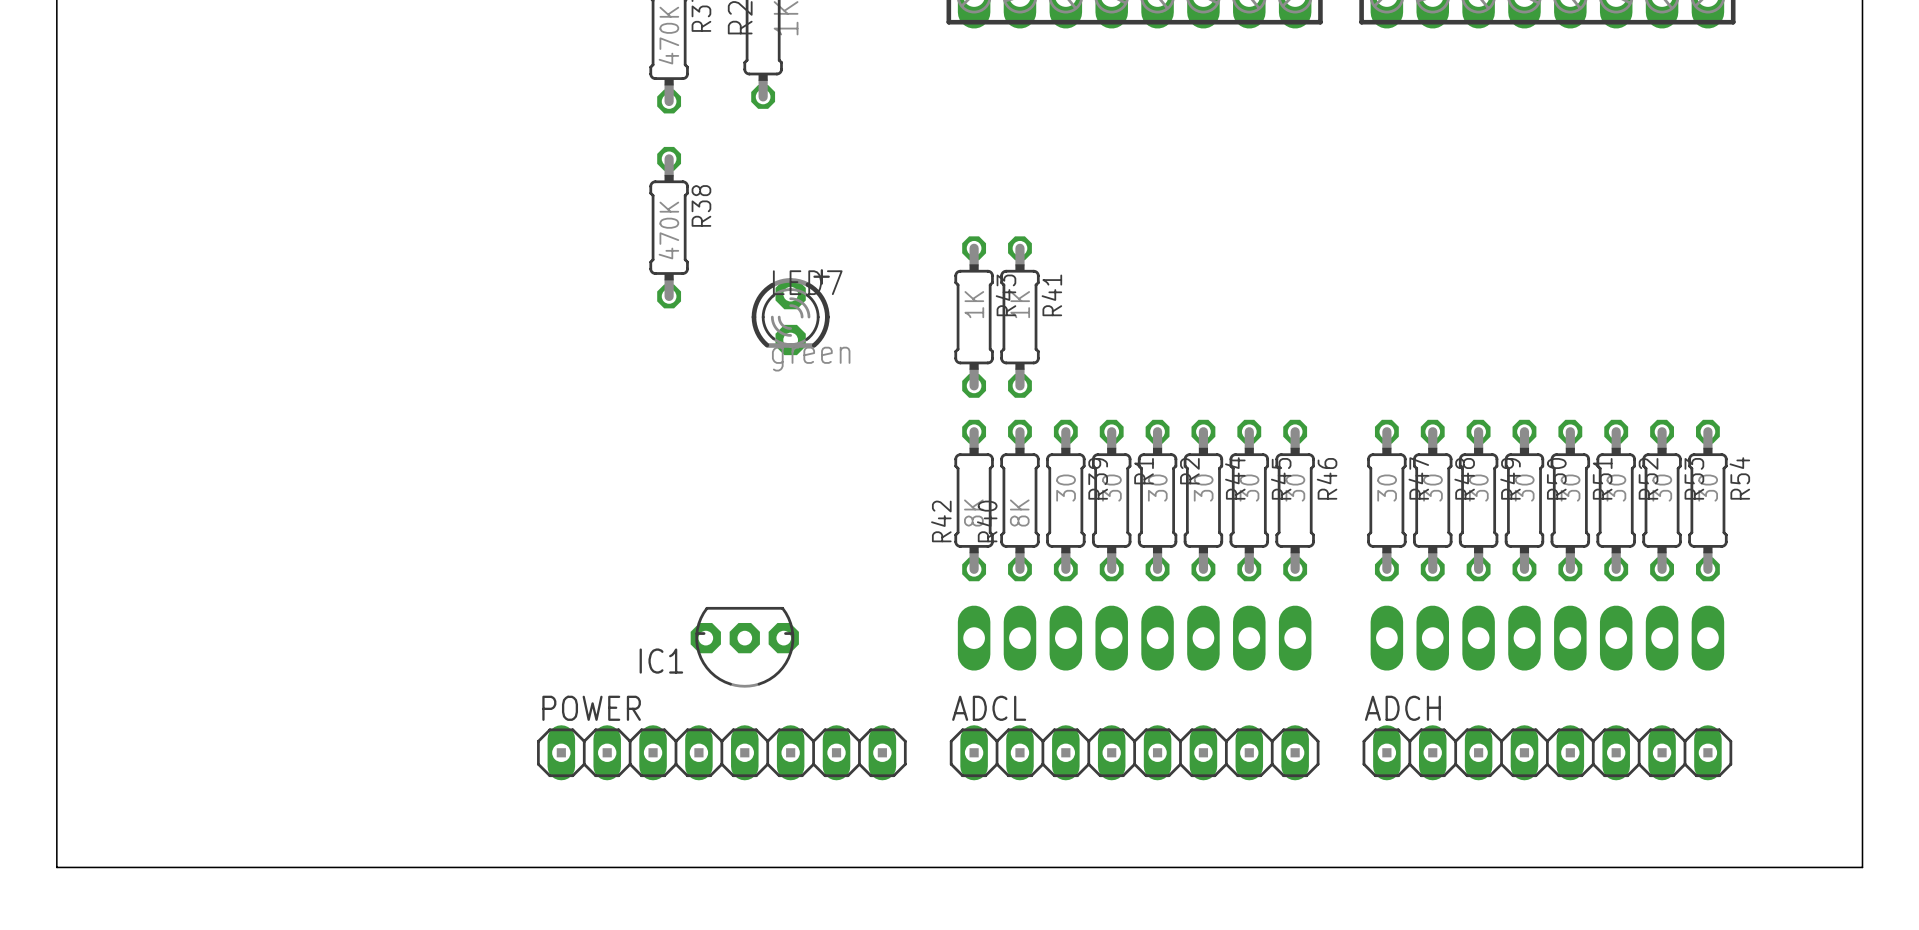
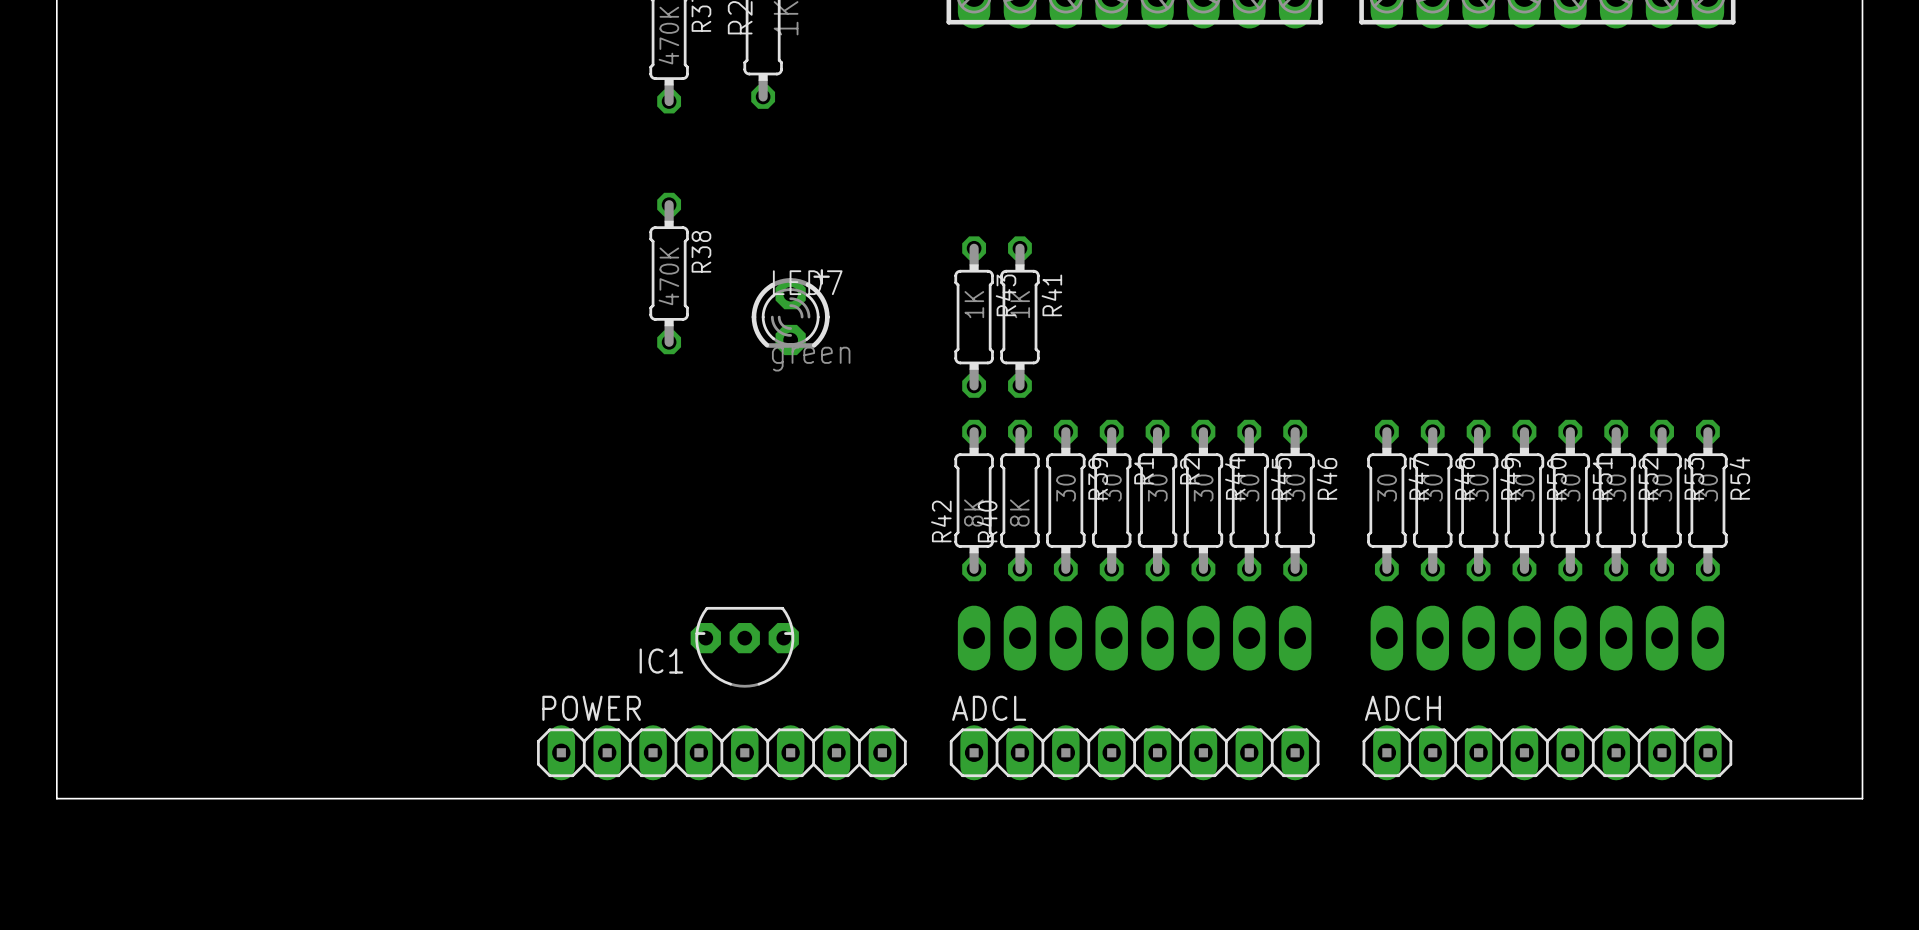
R38 position: (669, 227) -> (669, 273)
board edge: (56, 798) (56, 867) (1862, 867) (1862, 798) -> (56, 798) (1862, 798)

